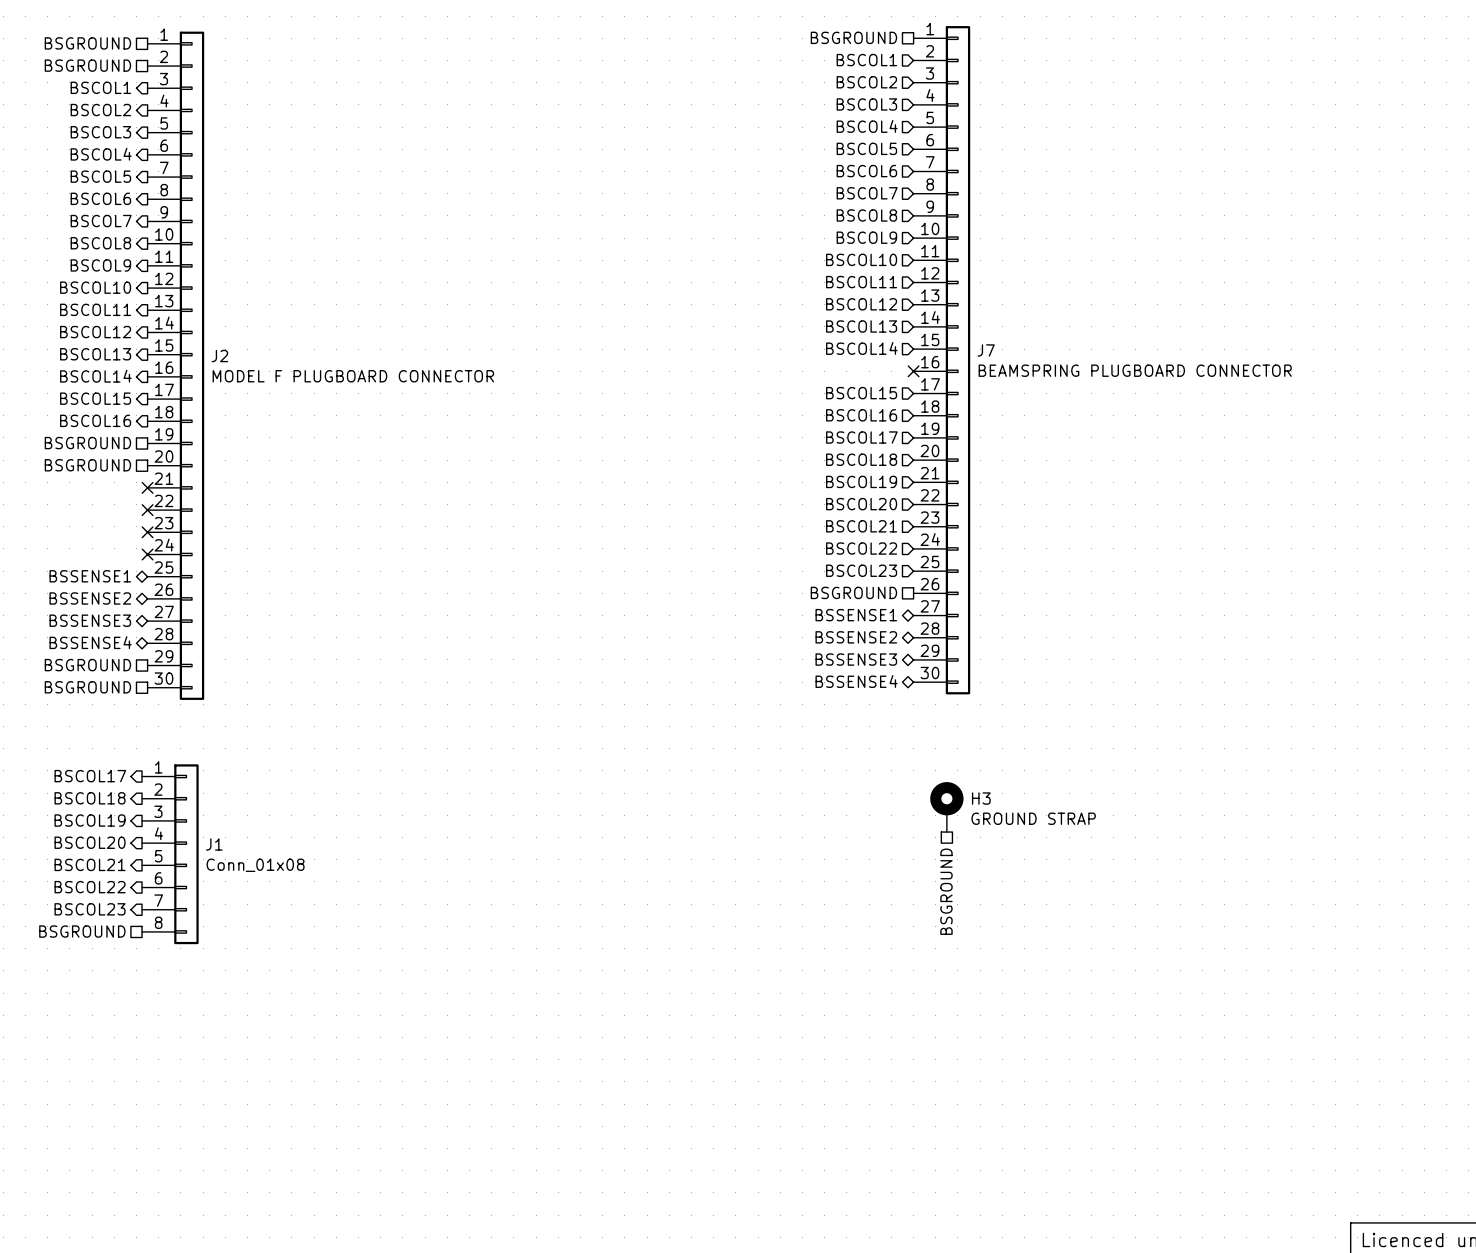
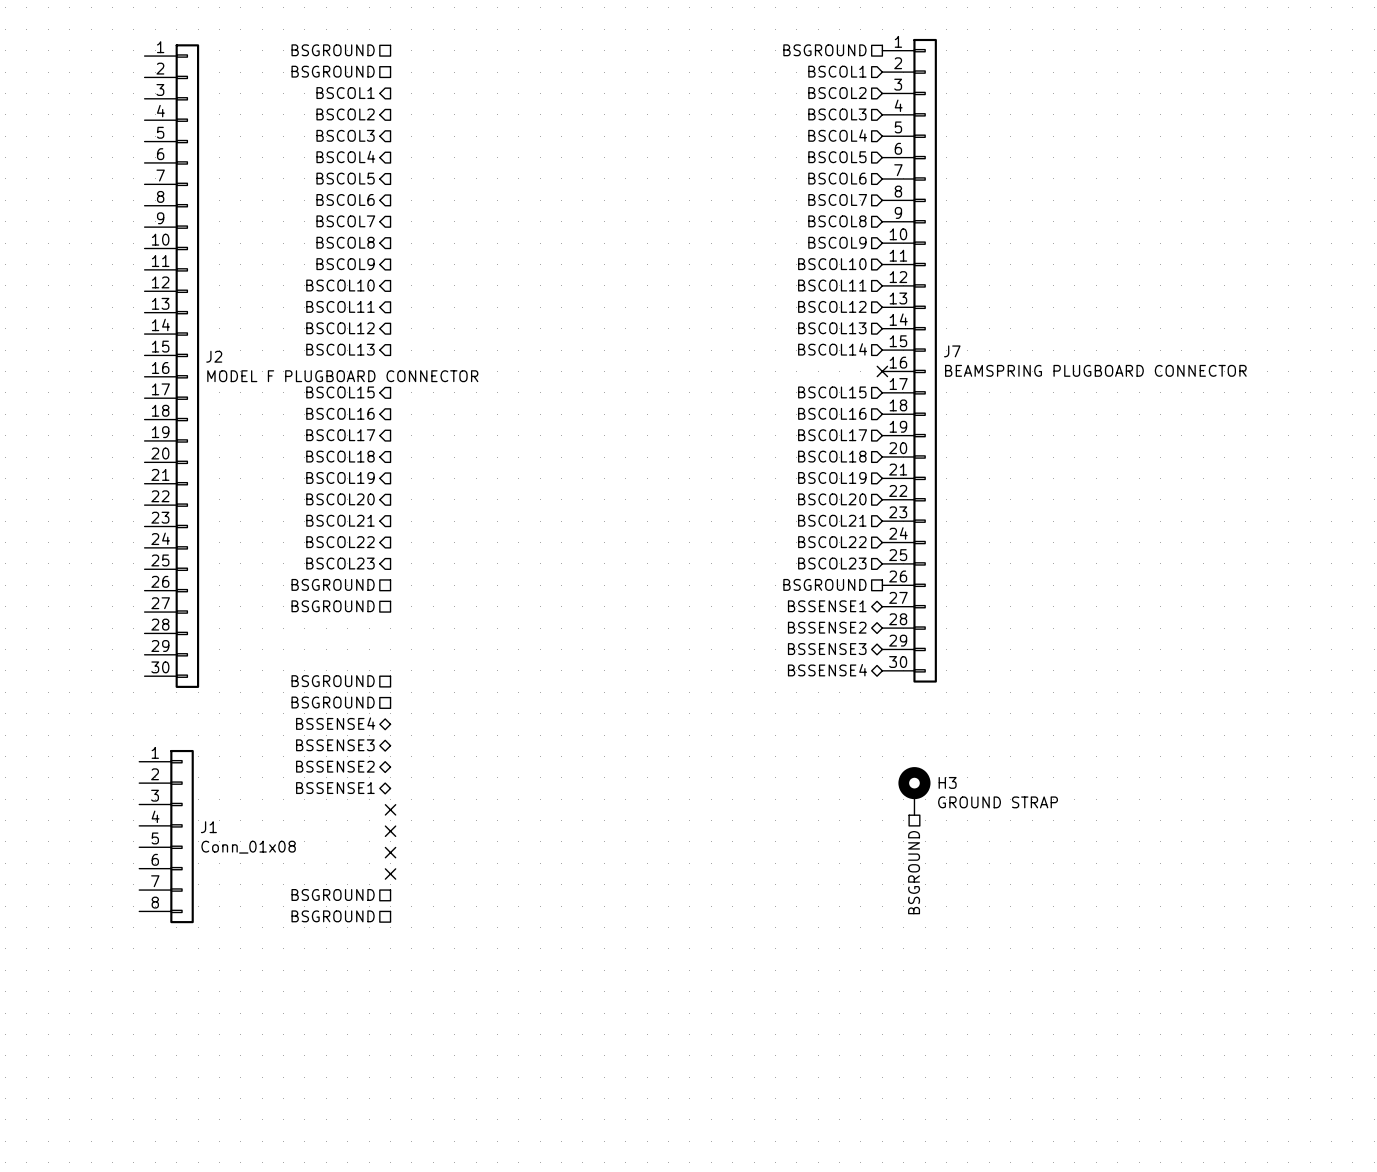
hierarchical label: none -> BSGROUND (333, 50)
hierarchical label: BSGROUND (87, 43) -> none
hierarchical label: none -> BSGROUND (333, 71)
hierarchical label: BSGROUND (87, 65) -> none
hierarchical label: none -> BSCOL1 (345, 93)
hierarchical label: BSCOL1 (100, 87) -> none
hierarchical label: none -> BSCOL2 (345, 114)
hierarchical label: BSCOL2 (100, 110) -> none
hierarchical label: none -> BSCOL3 (345, 135)
hierarchical label: BSCOL3 (100, 132) -> none
hierarchical label: none -> BSCOL4 (345, 156)
hierarchical label: BSCOL4 (101, 154) -> none
hierarchical label: none -> BSCOL5 (345, 178)
hierarchical label: BSCOL5 (100, 176) -> none
hierarchical label: none -> BSCOL6 (345, 199)
hierarchical label: BSCOL6 (100, 198) -> none
hierarchical label: none -> BSCOL7 (345, 221)
hierarchical label: BSCOL7 (101, 221) -> none
hierarchical label: none -> BSCOL8 (345, 242)
hierarchical label: BSCOL8 (100, 243) -> none
hierarchical label: none -> BSCOL9 (345, 264)
hierarchical label: BSCOL9 (100, 265) -> none
hierarchical label: none -> BSCOL10 (340, 285)
hierarchical label: BSCOL10 (95, 287) -> none
hierarchical label: none -> BSCOL11 (340, 306)
hierarchical label: BSCOL11 (95, 309) -> none
hierarchical label: none -> BSCOL12 (340, 328)
hierarchical label: BSCOL12 (95, 332) -> none
hierarchical label: none -> BSCOL13 (340, 349)
hierarchical label: BSCOL13 (95, 354) -> none
hierarchical label: BSCOL14 (95, 376) -> none
hierarchical label: none -> BSCOL15 (340, 392)
hierarchical label: BSCOL15 (95, 398) -> none
hierarchical label: none -> BSCOL16 (340, 413)
hierarchical label: BSCOL16 (95, 420) -> none
hierarchical label: none -> BSCOL17 (340, 435)
hierarchical label: BSGROUND (87, 443) -> none
hierarchical label: none -> BSCOL18 (340, 456)
hierarchical label: BSGROUND (87, 465) -> none
hierarchical label: none -> BSCOL19 (340, 477)
no-connect mark: (147, 487) -> none
hierarchical label: none -> BSCOL20 (340, 499)
no-connect mark: (147, 510) -> none
hierarchical label: none -> BSCOL21 (340, 520)
no-connect mark: (147, 532) -> none
hierarchical label: none -> BSCOL22 (340, 542)
no-connect mark: (147, 554) -> none
hierarchical label: none -> BSCOL23 (340, 563)
hierarchical label: BSSENSE1 (90, 576) -> none
hierarchical label: none -> BSGROUND (333, 584)
hierarchical label: BSSENSE2 (90, 598) -> none
hierarchical label: none -> BSGROUND (333, 606)
hierarchical label: BSSENSE3 (90, 620) -> none
hierarchical label: BSSENSE4 (90, 642) -> none
hierarchical label: BSGROUND (87, 665) -> none
hierarchical label: BSGROUND (87, 687) -> none
hierarchical label: none -> BSGROUND (333, 681)
hierarchical label: none -> BSGROUND (333, 702)
hierarchical label: none -> BSSENSE4 (335, 723)
hierarchical label: none -> BSSENSE3 (335, 745)
hierarchical label: BSCOL17 (90, 776) -> none
hierarchical label: none -> BSSENSE2 (335, 766)
hierarchical label: BSCOL18 (90, 798) -> none
hierarchical label: none -> BSSENSE1 (335, 788)
hierarchical label: BSCOL19 (90, 820) -> none
no-connect mark: none -> (390, 809)
hierarchical label: BSCOL20 (90, 842) -> none
no-connect mark: none -> (390, 831)
hierarchical label: BSCOL21 (90, 864) -> none
no-connect mark: none -> (390, 852)
hierarchical label: BSCOL22 (90, 887) -> none
no-connect mark: none -> (390, 874)
hierarchical label: BSCOL23 (90, 909) -> none
hierarchical label: none -> BSGROUND (333, 894)
hierarchical label: BSGROUND (82, 931) -> none
hierarchical label: none -> BSGROUND (333, 916)

